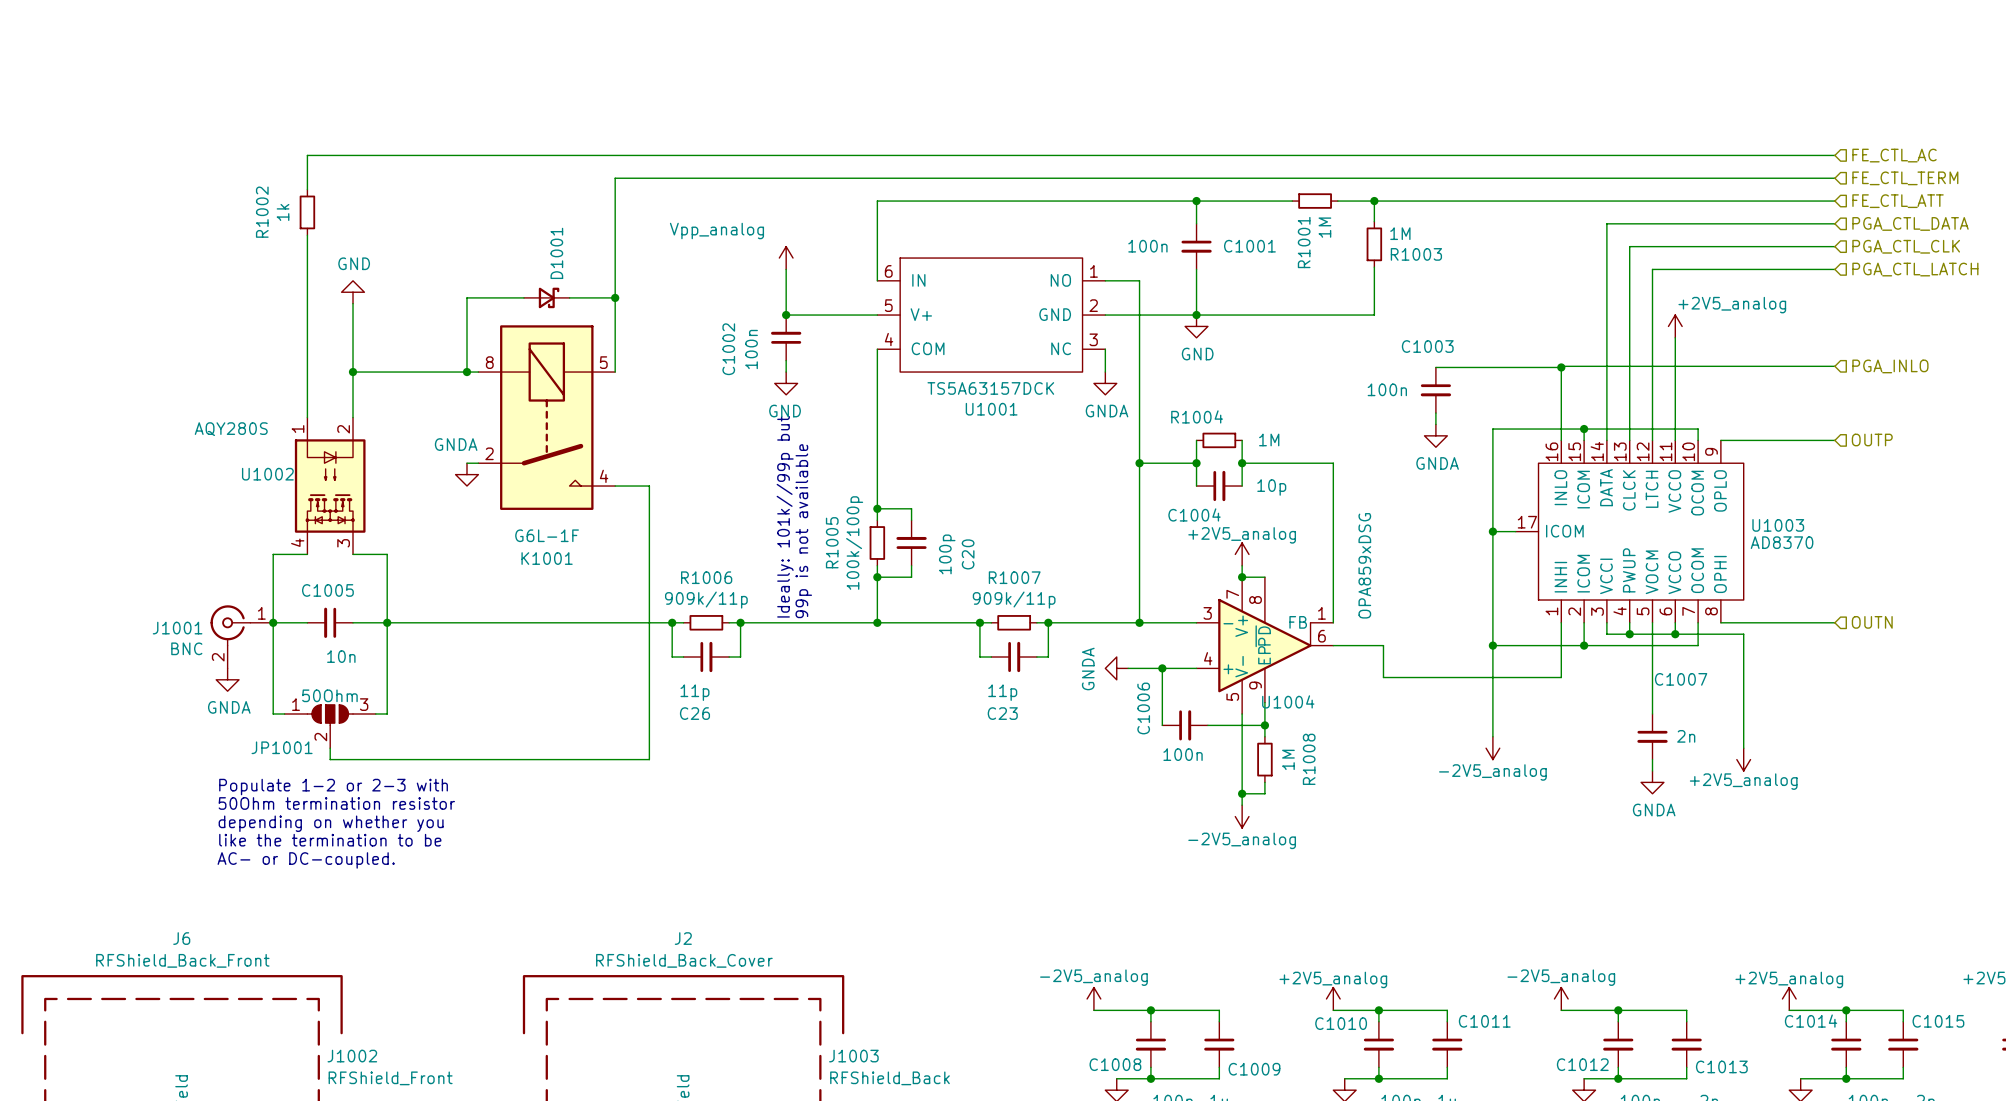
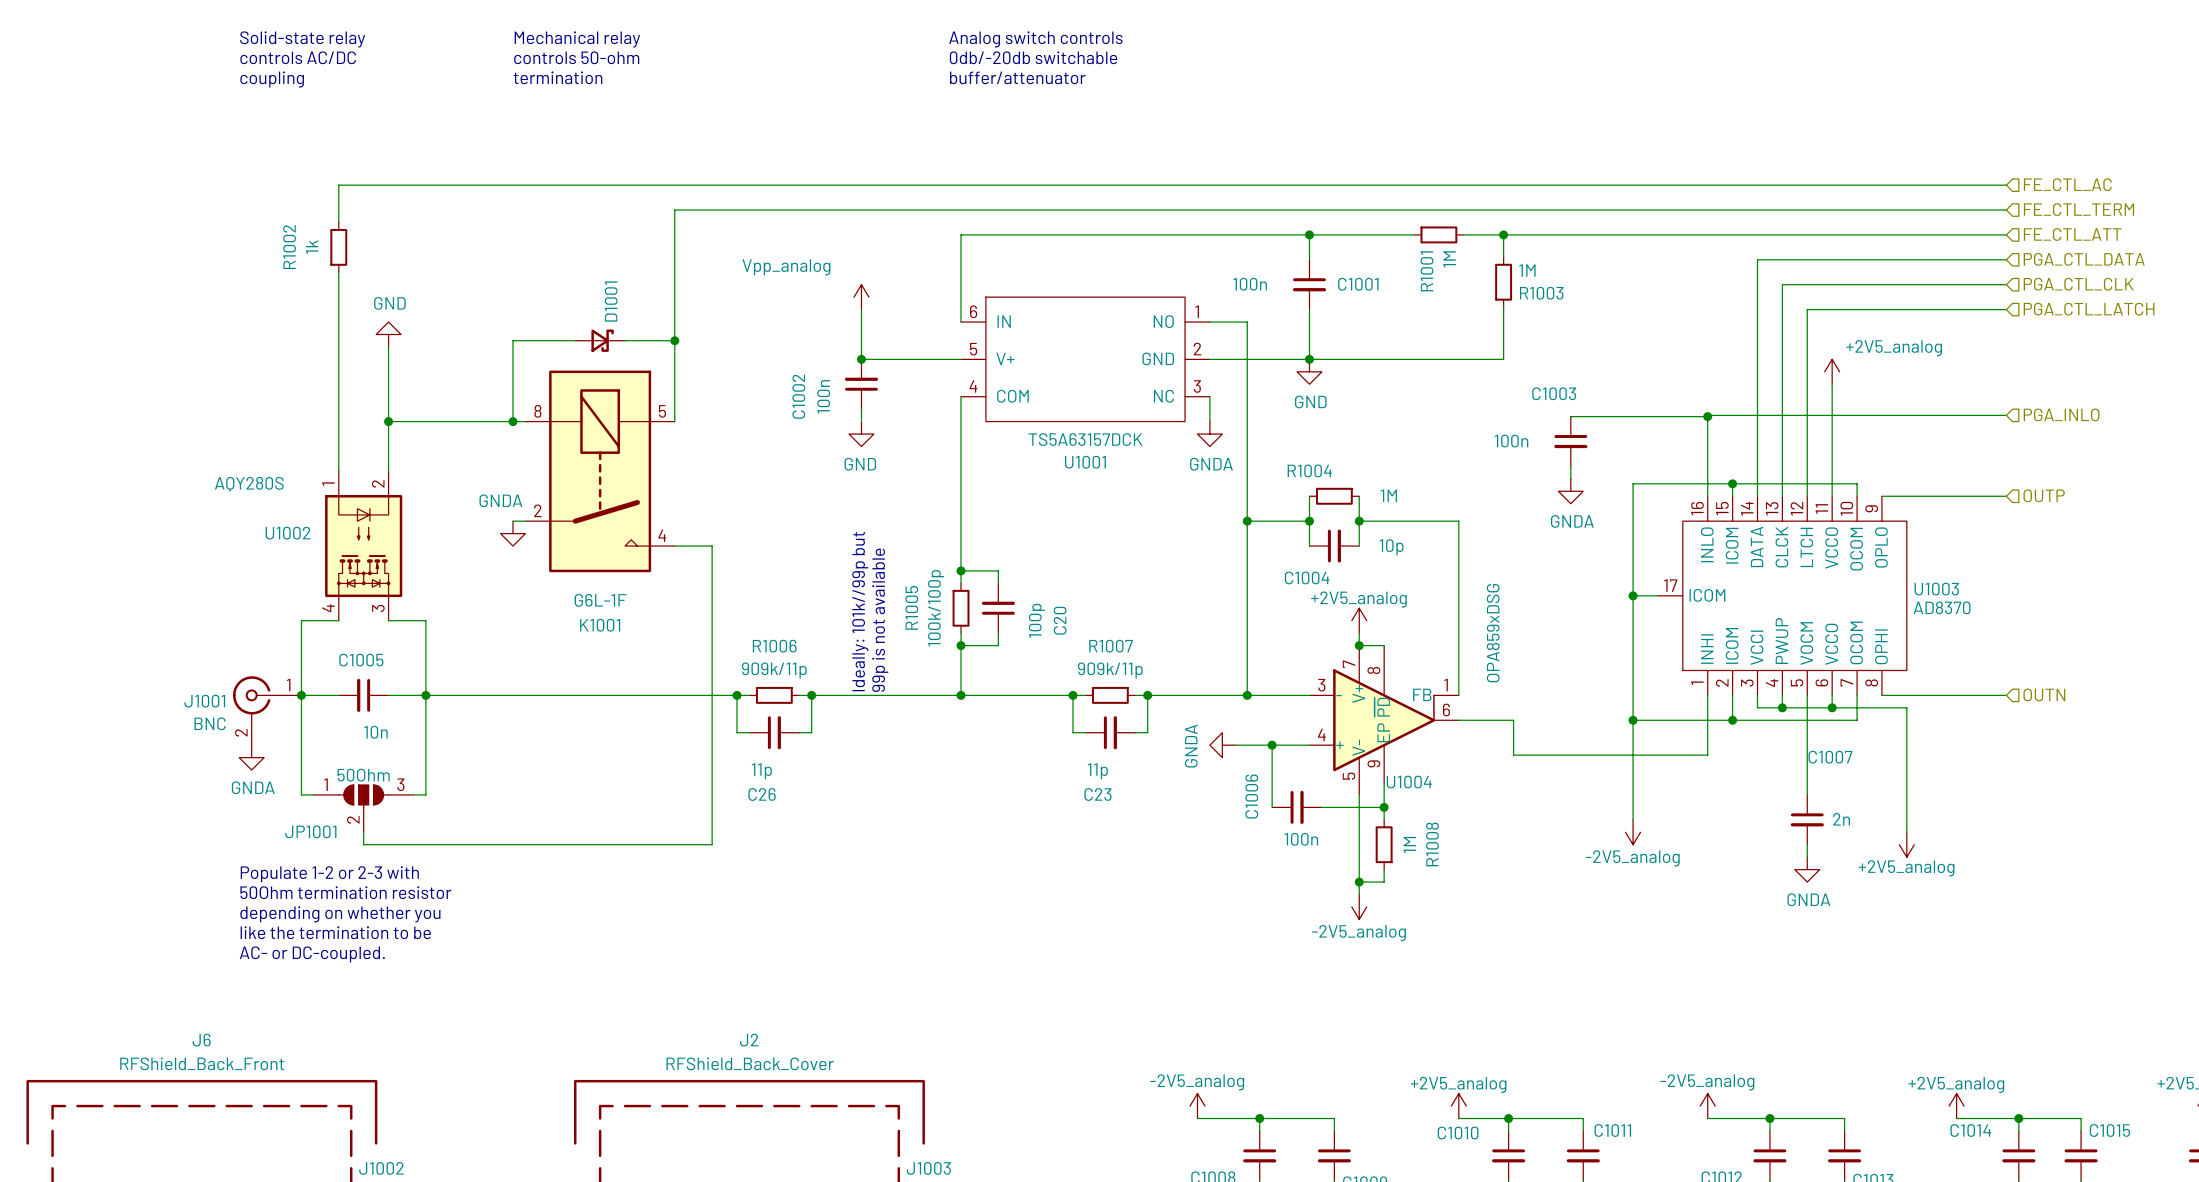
text: none -> Solid-state relay (302, 39)
text: none -> Mechanical relay (577, 39)
text: none -> Analog switch controls (1035, 39)
text: none -> controls 50-ohm (576, 57)
text: none -> controls AC/DC (298, 57)
text: none -> 0db/-20db switchable (1033, 57)
text: none -> termination (557, 77)
text: none -> buffer/attenuator (1017, 77)
text: none -> coupling (272, 79)

